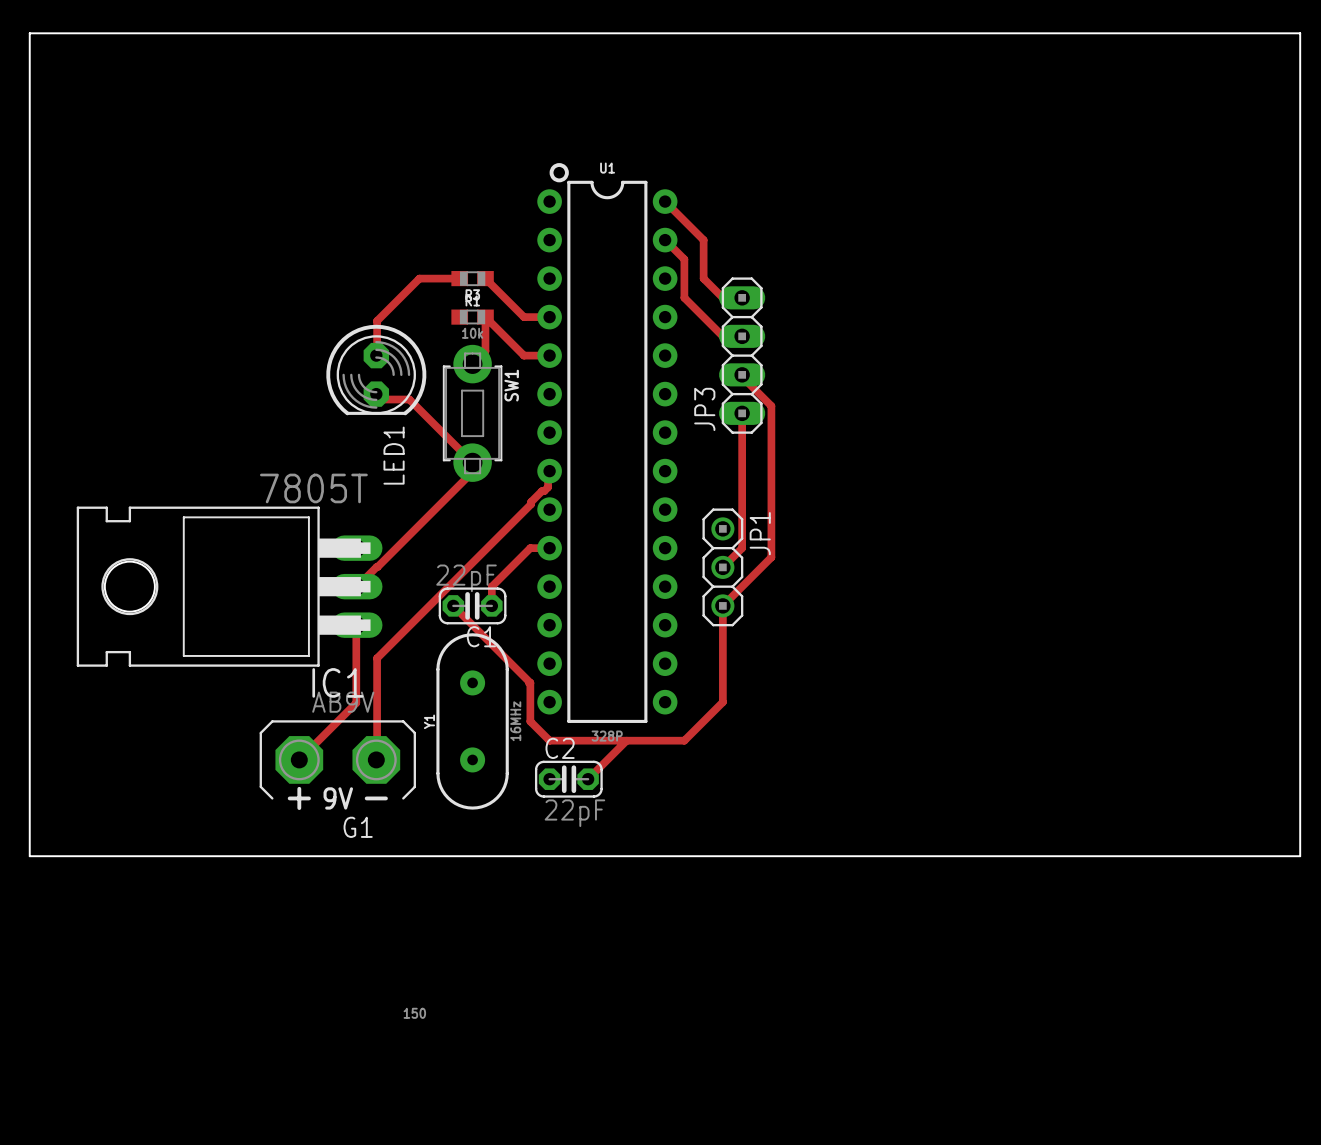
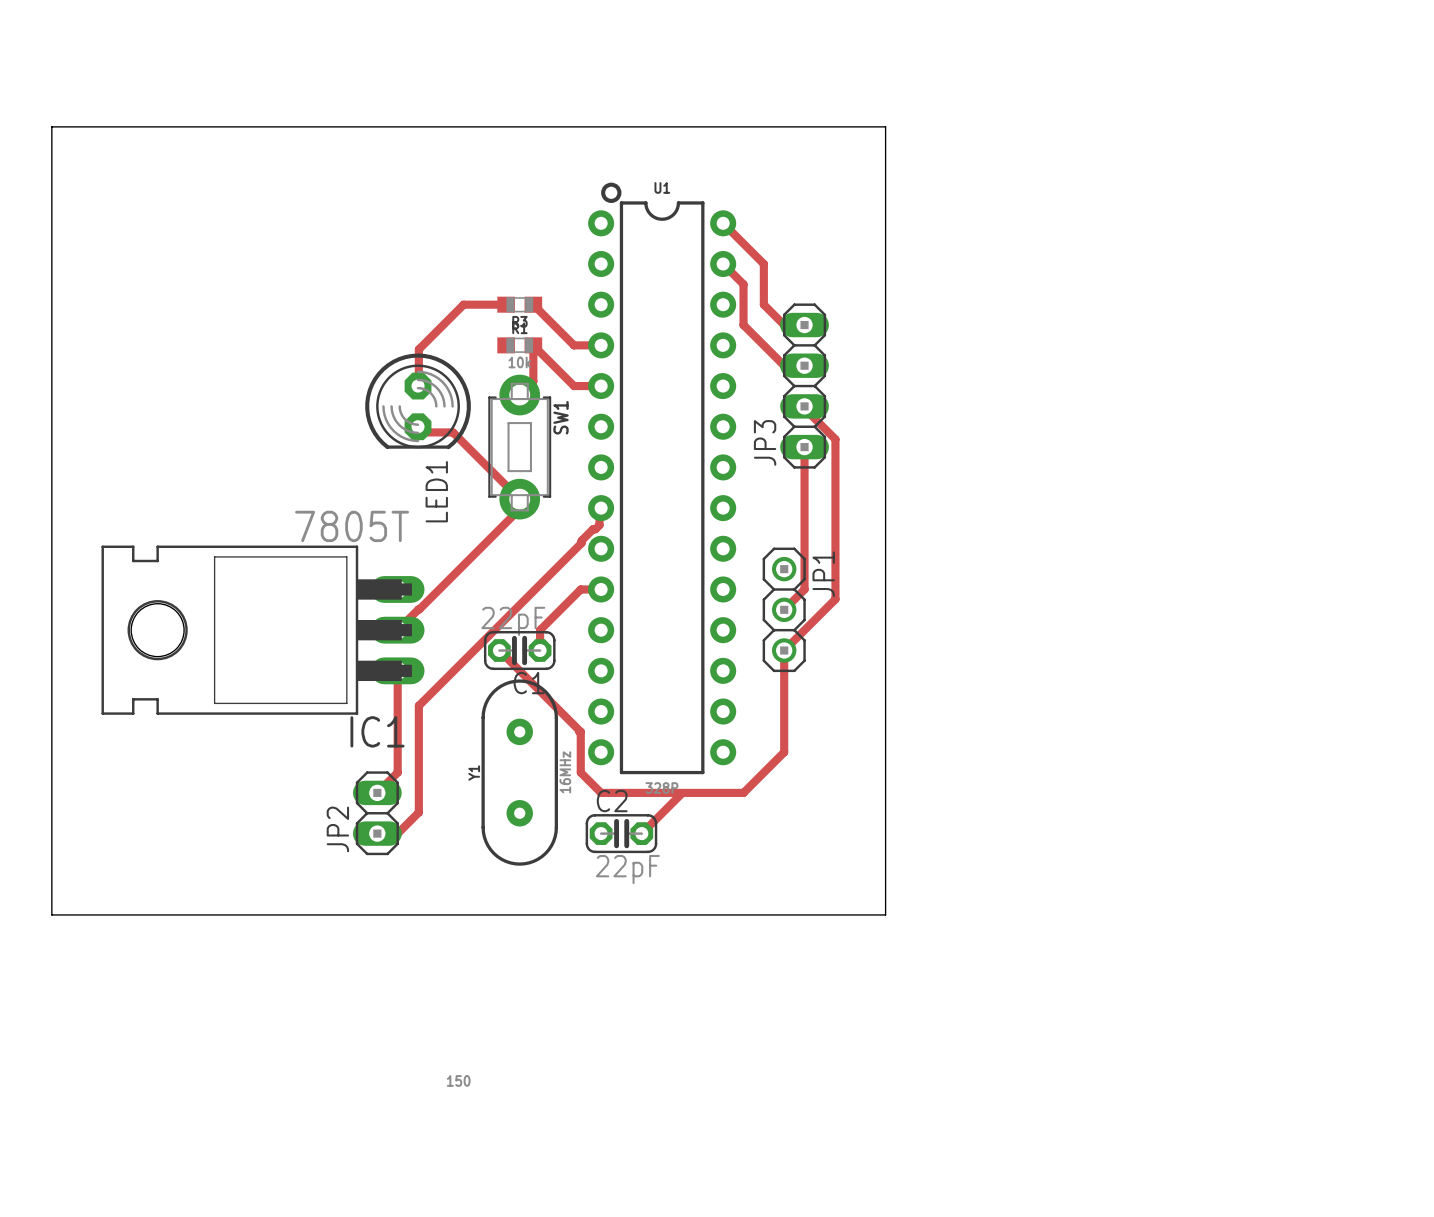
board edge: (29, 110) (29, 33) (1300, 33) (1300, 856) (818, 856) -> (51, 126) (885, 126) (885, 914)
track: (357, 625) (356, 702) (299, 759) -> (397, 670) (397, 772) (377, 792)
JP2: none -> (377, 813)
track: none -> (418, 813) (397, 833) (377, 833)
G1: AB9V (337, 765) -> none

